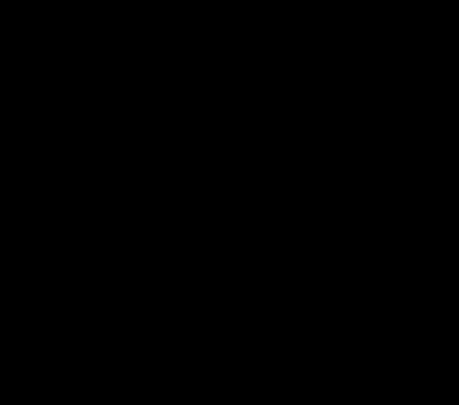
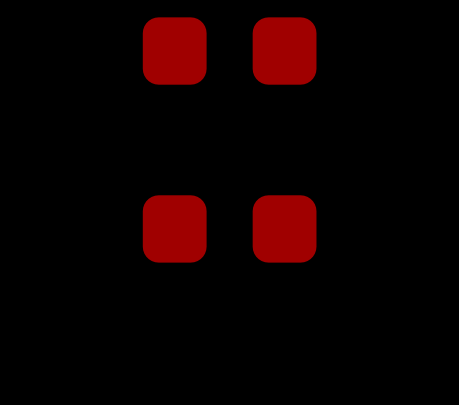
part: none -> (229, 51)
part: none -> (229, 228)

